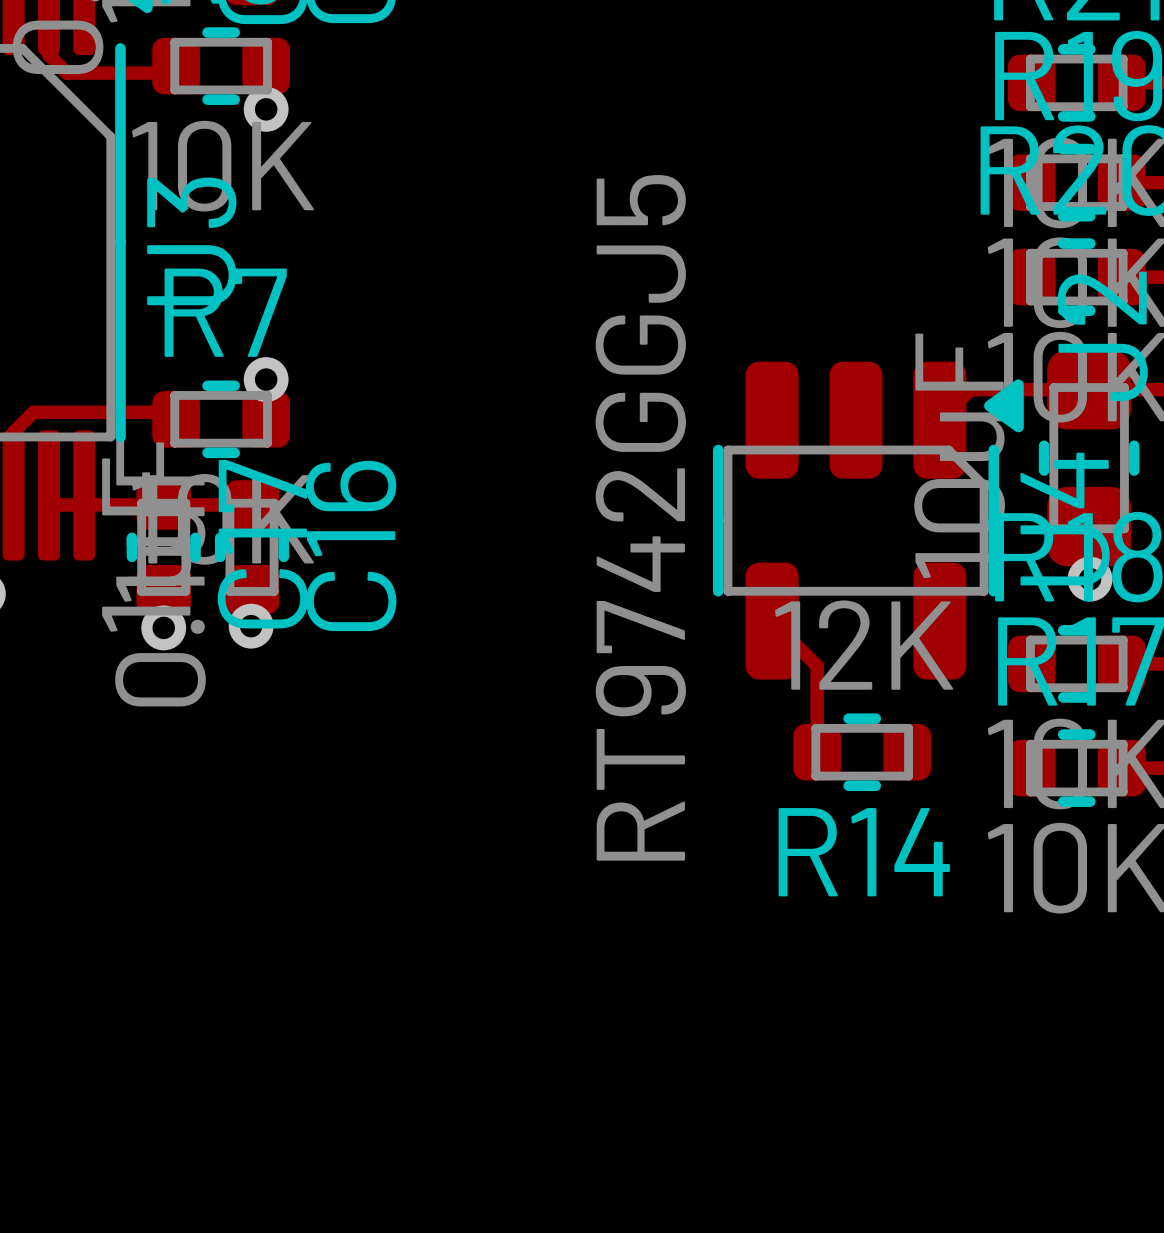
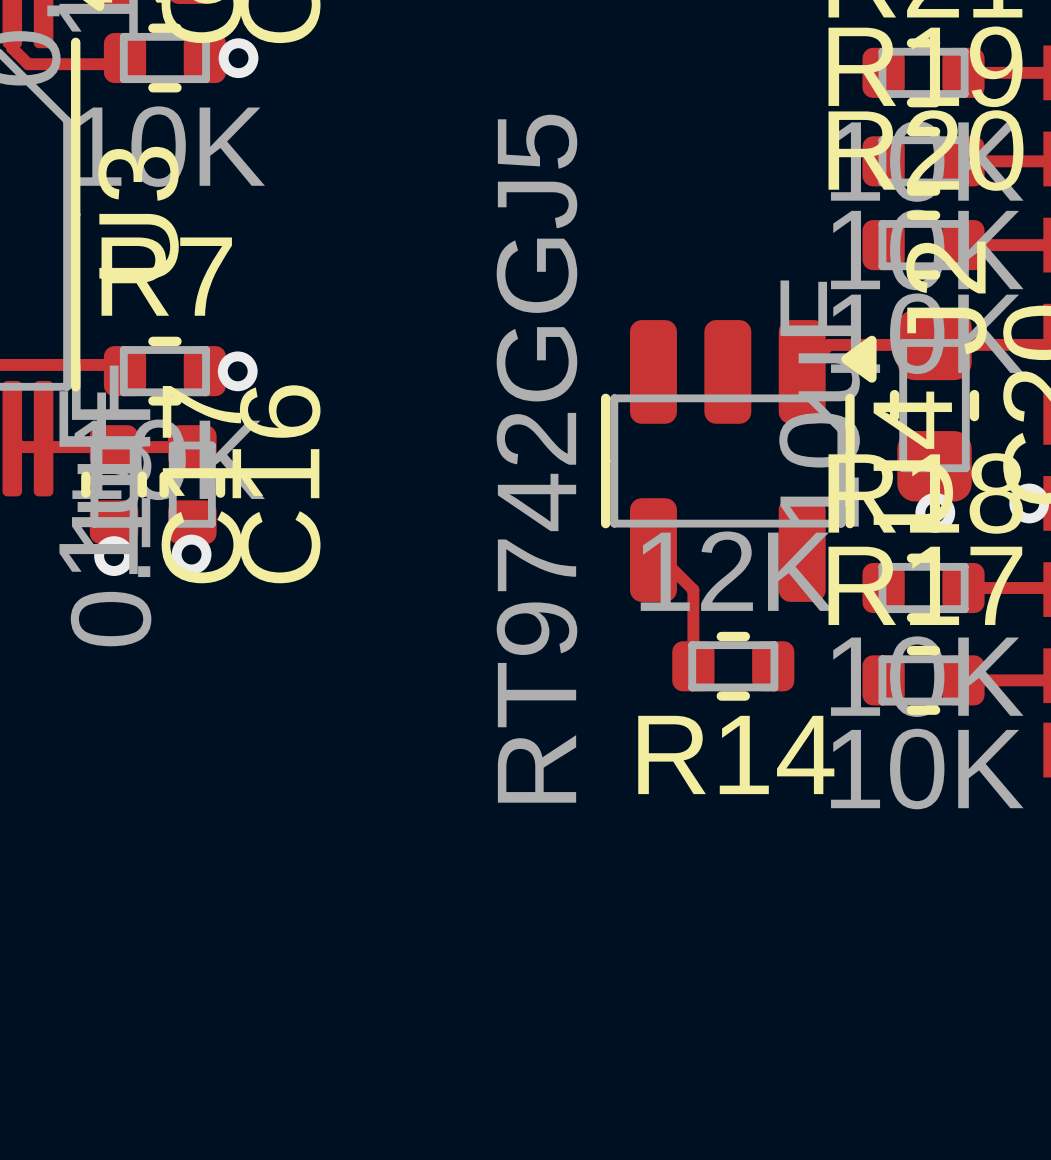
via position: (266, 109) -> (238, 58)
via position: (266, 379) -> (237, 371)

